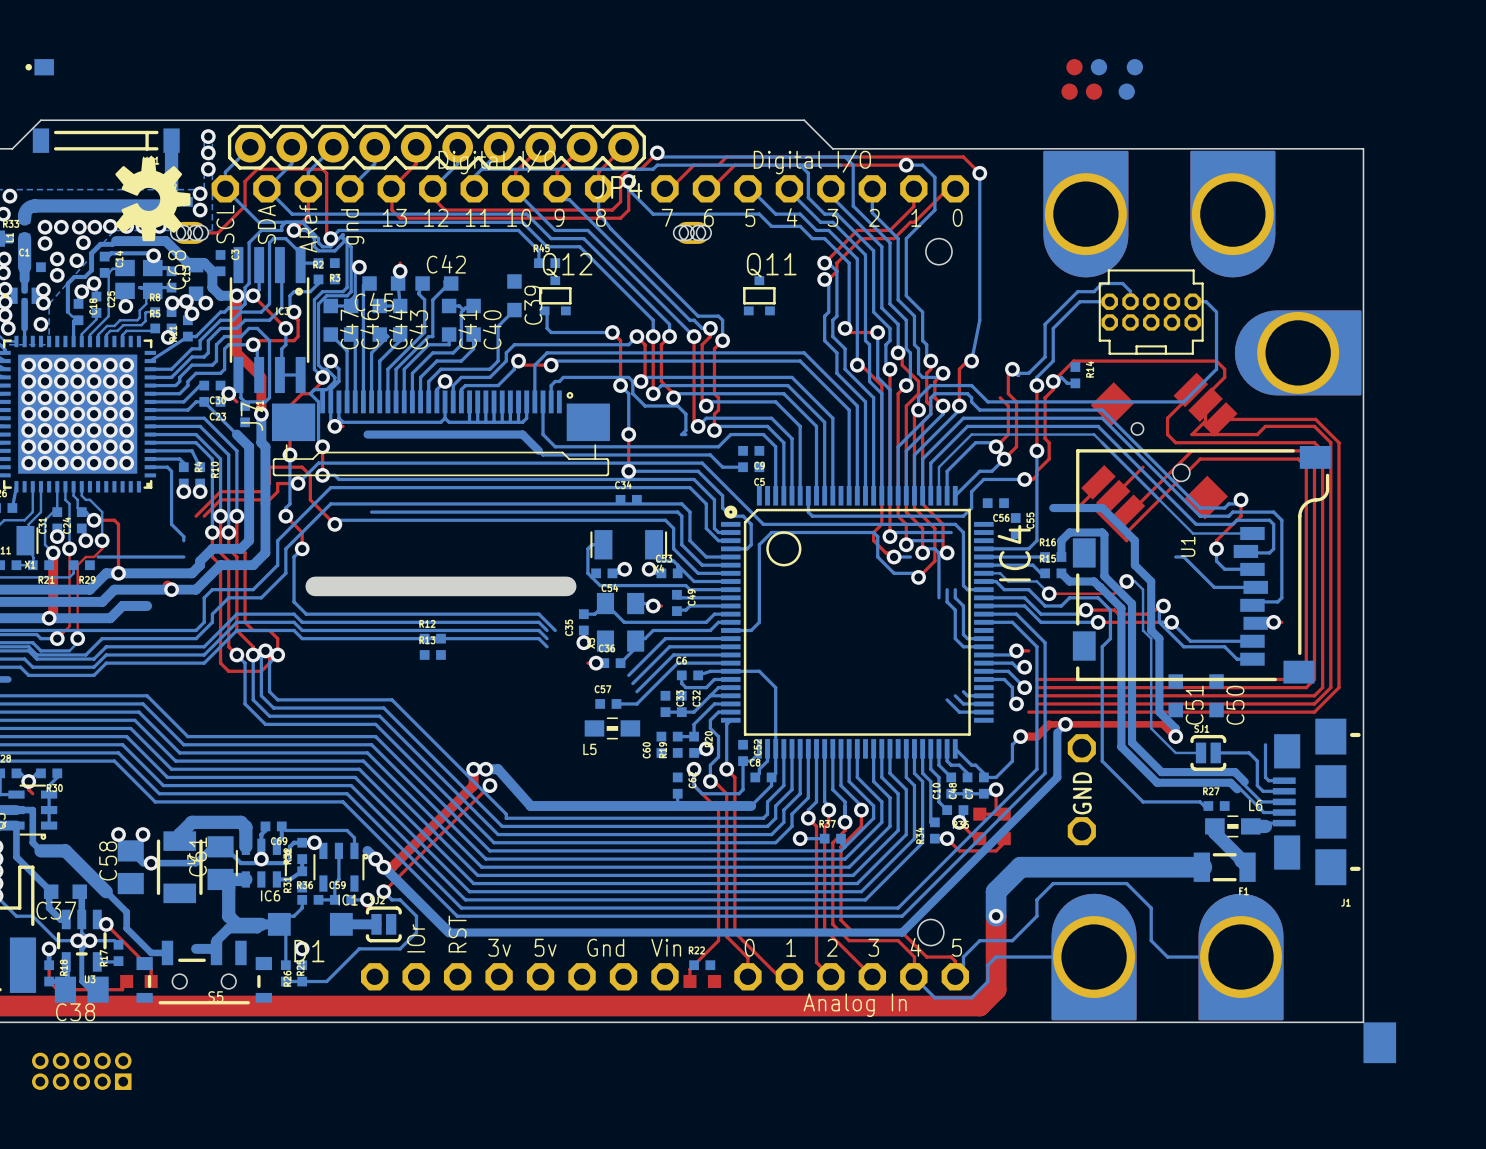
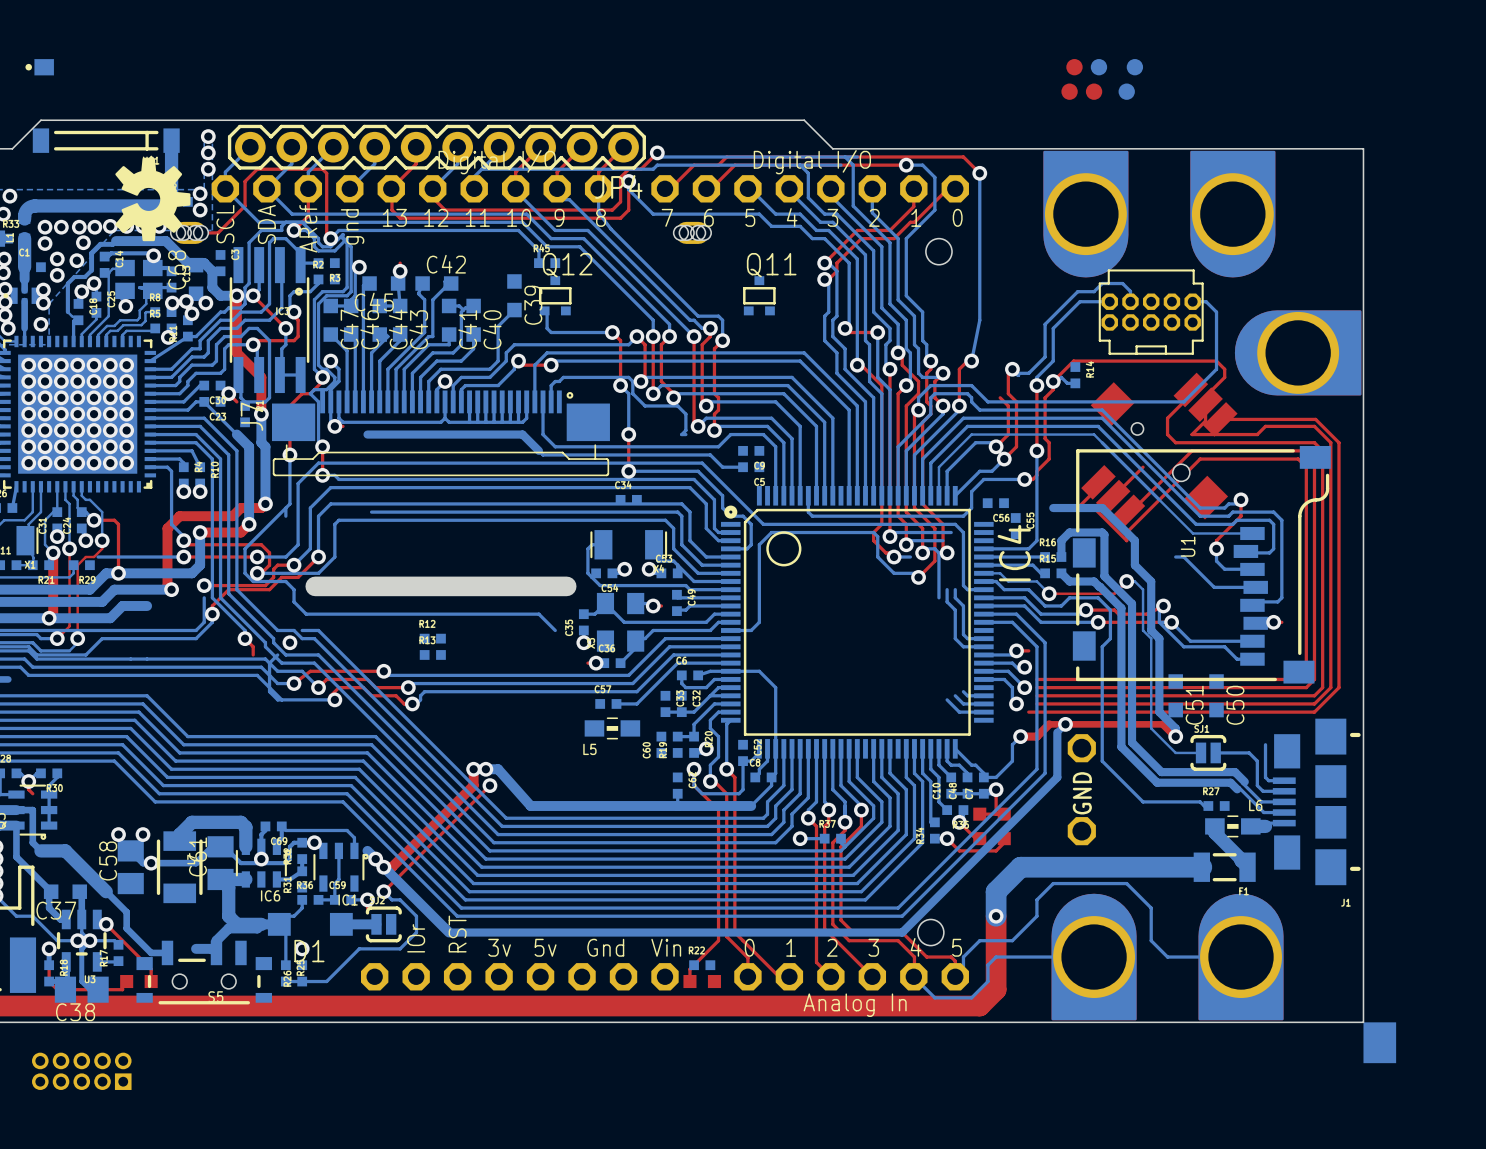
bottom track: none -> (298, 483) (298, 544) (285, 557) (257, 557)
top track: (298, 483) (277, 483) (277, 491) (269, 499) (220, 499) (204, 516) -> none
via: (298, 483) -> none
bottom track: (265, 503) (265, 552) (253, 565) (220, 565) (196, 589) (171, 589) -> none
top track: none -> (265, 503) (261, 508) (240, 508) (232, 516) (179, 516) (167, 528) (167, 585)
via: none -> (265, 503)
bottom track: (310, 508) (277, 540) (277, 565) (253, 589) (212, 589) (204, 597) -> (310, 508) (310, 548) (294, 565)
top track: (196, 516) (220, 491) (261, 491) (269, 483) (269, 467) (302, 467) (310, 475) (310, 499) (334, 524) -> none
top track: (220, 516) (220, 552) (228, 561) (228, 646) (236, 654) -> none
via: (220, 516) -> none
bottom track: none -> (236, 516) (236, 589) (277, 630)
top track: (236, 516) (236, 544) (245, 552) (245, 622) (253, 630) (269, 630) (277, 638) (277, 654) -> none
via position: (236, 516) -> (249, 524)
top track: (285, 516) (302, 532) (302, 548) -> none
via: (285, 516) -> none
bottom track: (318, 516) (285, 548) (285, 573) (261, 597) (228, 597) (212, 614) -> (318, 516) (318, 557)
bottom track: (249, 524) (249, 540) (240, 548) (212, 548) (200, 561) -> (200, 532) (200, 561)
top track: none -> (249, 524) (240, 532) (200, 532)
bottom track: none -> (334, 524) (334, 557) (318, 573) (257, 573)
via: (334, 524) -> none
bottom track: none -> (212, 532) (212, 597) (245, 630) (245, 638)
top track: (212, 532) (212, 557) (220, 565) (220, 663) (228, 671) (261, 671) (269, 663) (269, 654) (265, 650) -> none
via position: (212, 532) -> (200, 532)
top track: (228, 532) (228, 548) (236, 557) (236, 630) (245, 638) -> none
via: (228, 532) -> none
top track: none -> (183, 540) (187, 544) (261, 544) (269, 552) (269, 565) (261, 573) (257, 573)
via: none -> (183, 540)
bottom track: (302, 548) (294, 557) (294, 589) -> (285, 508) (245, 548) (245, 573) (253, 581) (285, 581) (294, 589)
via: (302, 548) -> none
via: none -> (183, 557)
top track: none -> (257, 557) (183, 557)
via: none -> (257, 557)
top track: none -> (318, 557) (298, 577) (281, 577) (269, 589) (228, 589) (212, 605) (212, 614)
via: none -> (318, 557)
top track: none -> (294, 565) (277, 565) (273, 569) (273, 577) (265, 585) (204, 585)
via: none -> (294, 565)
via: none -> (257, 573)
via: none -> (204, 585)
via: none -> (212, 614)
bottom track: (277, 630) (236, 630) (204, 663) (106, 663) (94, 675) -> (281, 699) (257, 675) (94, 675)
bottom track: (302, 630) (294, 622) (236, 622) (204, 654) (106, 654) (94, 667) -> (294, 683) (277, 683) (261, 667) (94, 667)
bottom track: (318, 630) (538, 630) (547, 638) -> none
bottom track: (547, 630) (538, 622) (302, 622) (294, 614) (236, 614) (204, 646) (106, 646) (94, 659) -> (318, 687) (302, 671) (277, 671) (265, 659) (94, 659)
via: none -> (245, 638)
bottom track: (314, 638) (538, 638) (547, 646) -> none
via: none -> (289, 642)
bottom track: (265, 650) (261, 654) (261, 695) (273, 708) (383, 708) -> (314, 638) (383, 708)
via: (265, 650) -> none
bottom track: (236, 654) (245, 663) (245, 703) (265, 724) (375, 724) -> (220, 516) (220, 597) (265, 642) (265, 646) (281, 663) (314, 663) (375, 724)
via: (236, 654) -> none
bottom track: (253, 654) (253, 699) (269, 716) (379, 716) -> (228, 532) (228, 593) (273, 638) (273, 642) (285, 654) (318, 654) (379, 716)
via: (253, 654) -> none
via: (277, 654) -> none
bottom track: none -> (383, 671) (387, 675) (628, 675)
top track: none -> (383, 671) (310, 671) (294, 683)
via: none -> (383, 671)
via: none -> (294, 683)
bottom track: none -> (632, 683) (412, 683) (408, 687)
via: none -> (318, 687)
top track: none -> (408, 687) (375, 687) (367, 679) (326, 679) (318, 687)
via: none -> (408, 687)
bottom track: none -> (636, 691) (424, 691) (420, 695) (420, 699) (416, 703) (412, 703)
bottom track: (334, 699) (391, 699) (506, 814) (506, 818) -> (318, 630) (506, 818)
top track: none -> (334, 699) (330, 695) (338, 687) (363, 687) (371, 695) (396, 695) (404, 703) (412, 703)
via: none -> (334, 699)
via: none -> (412, 703)

